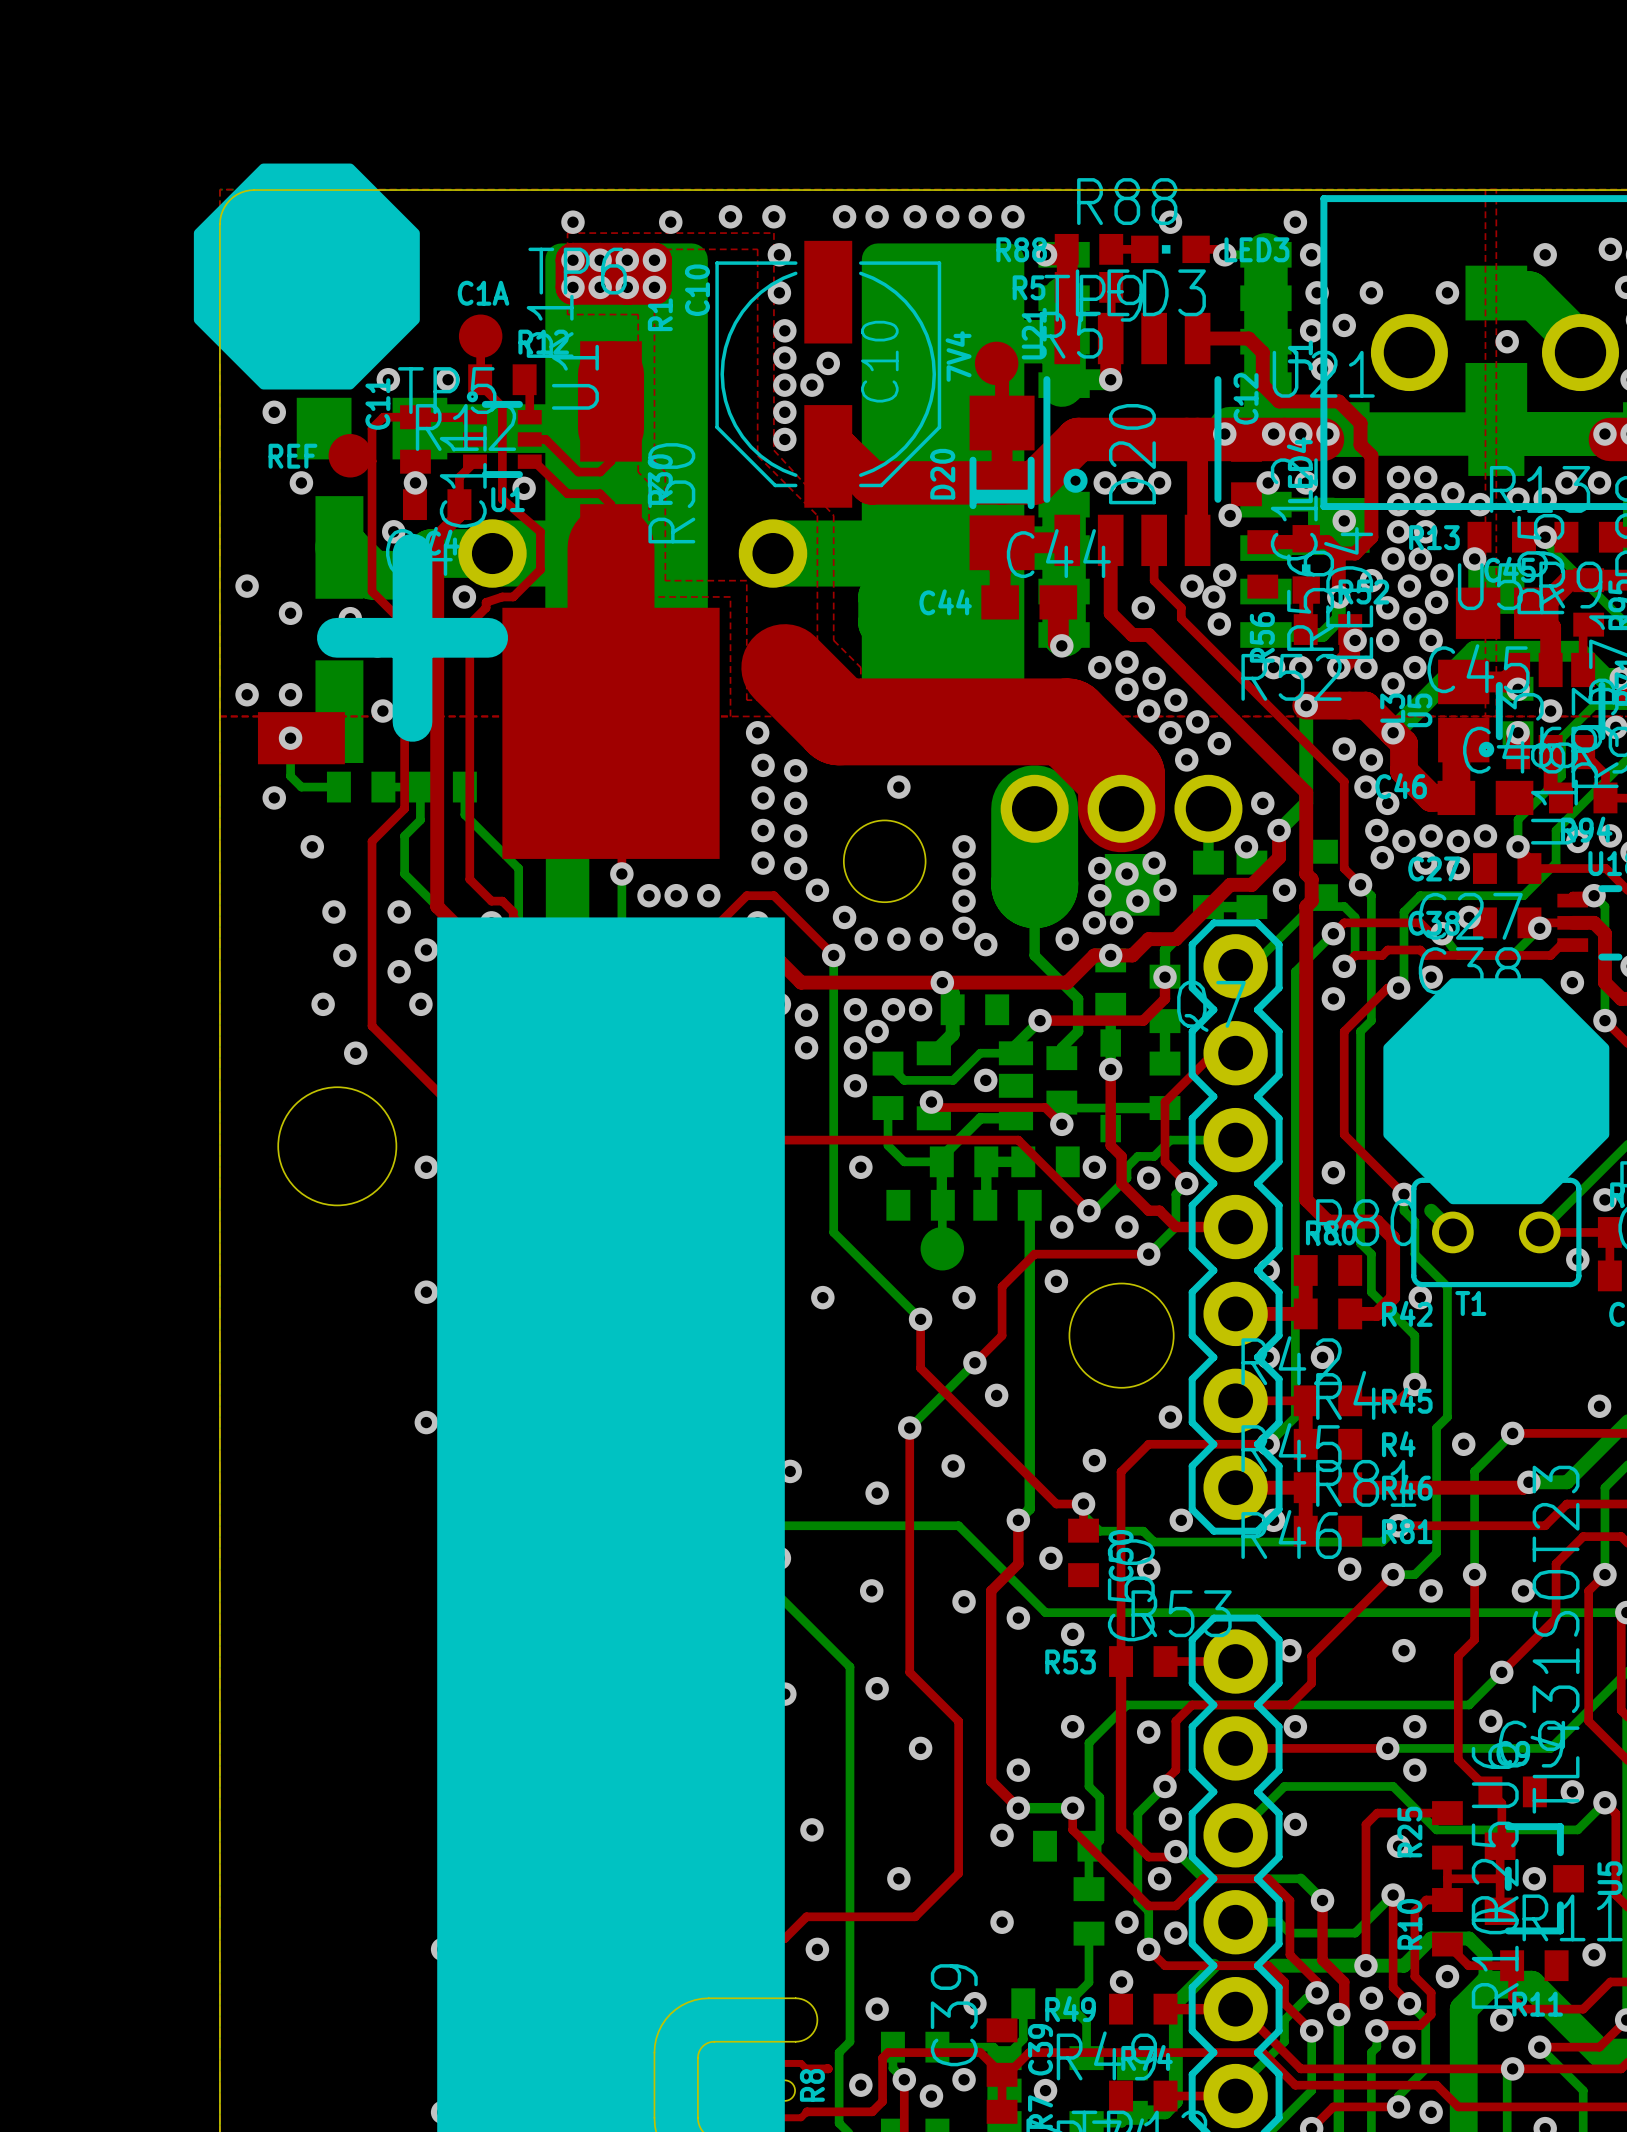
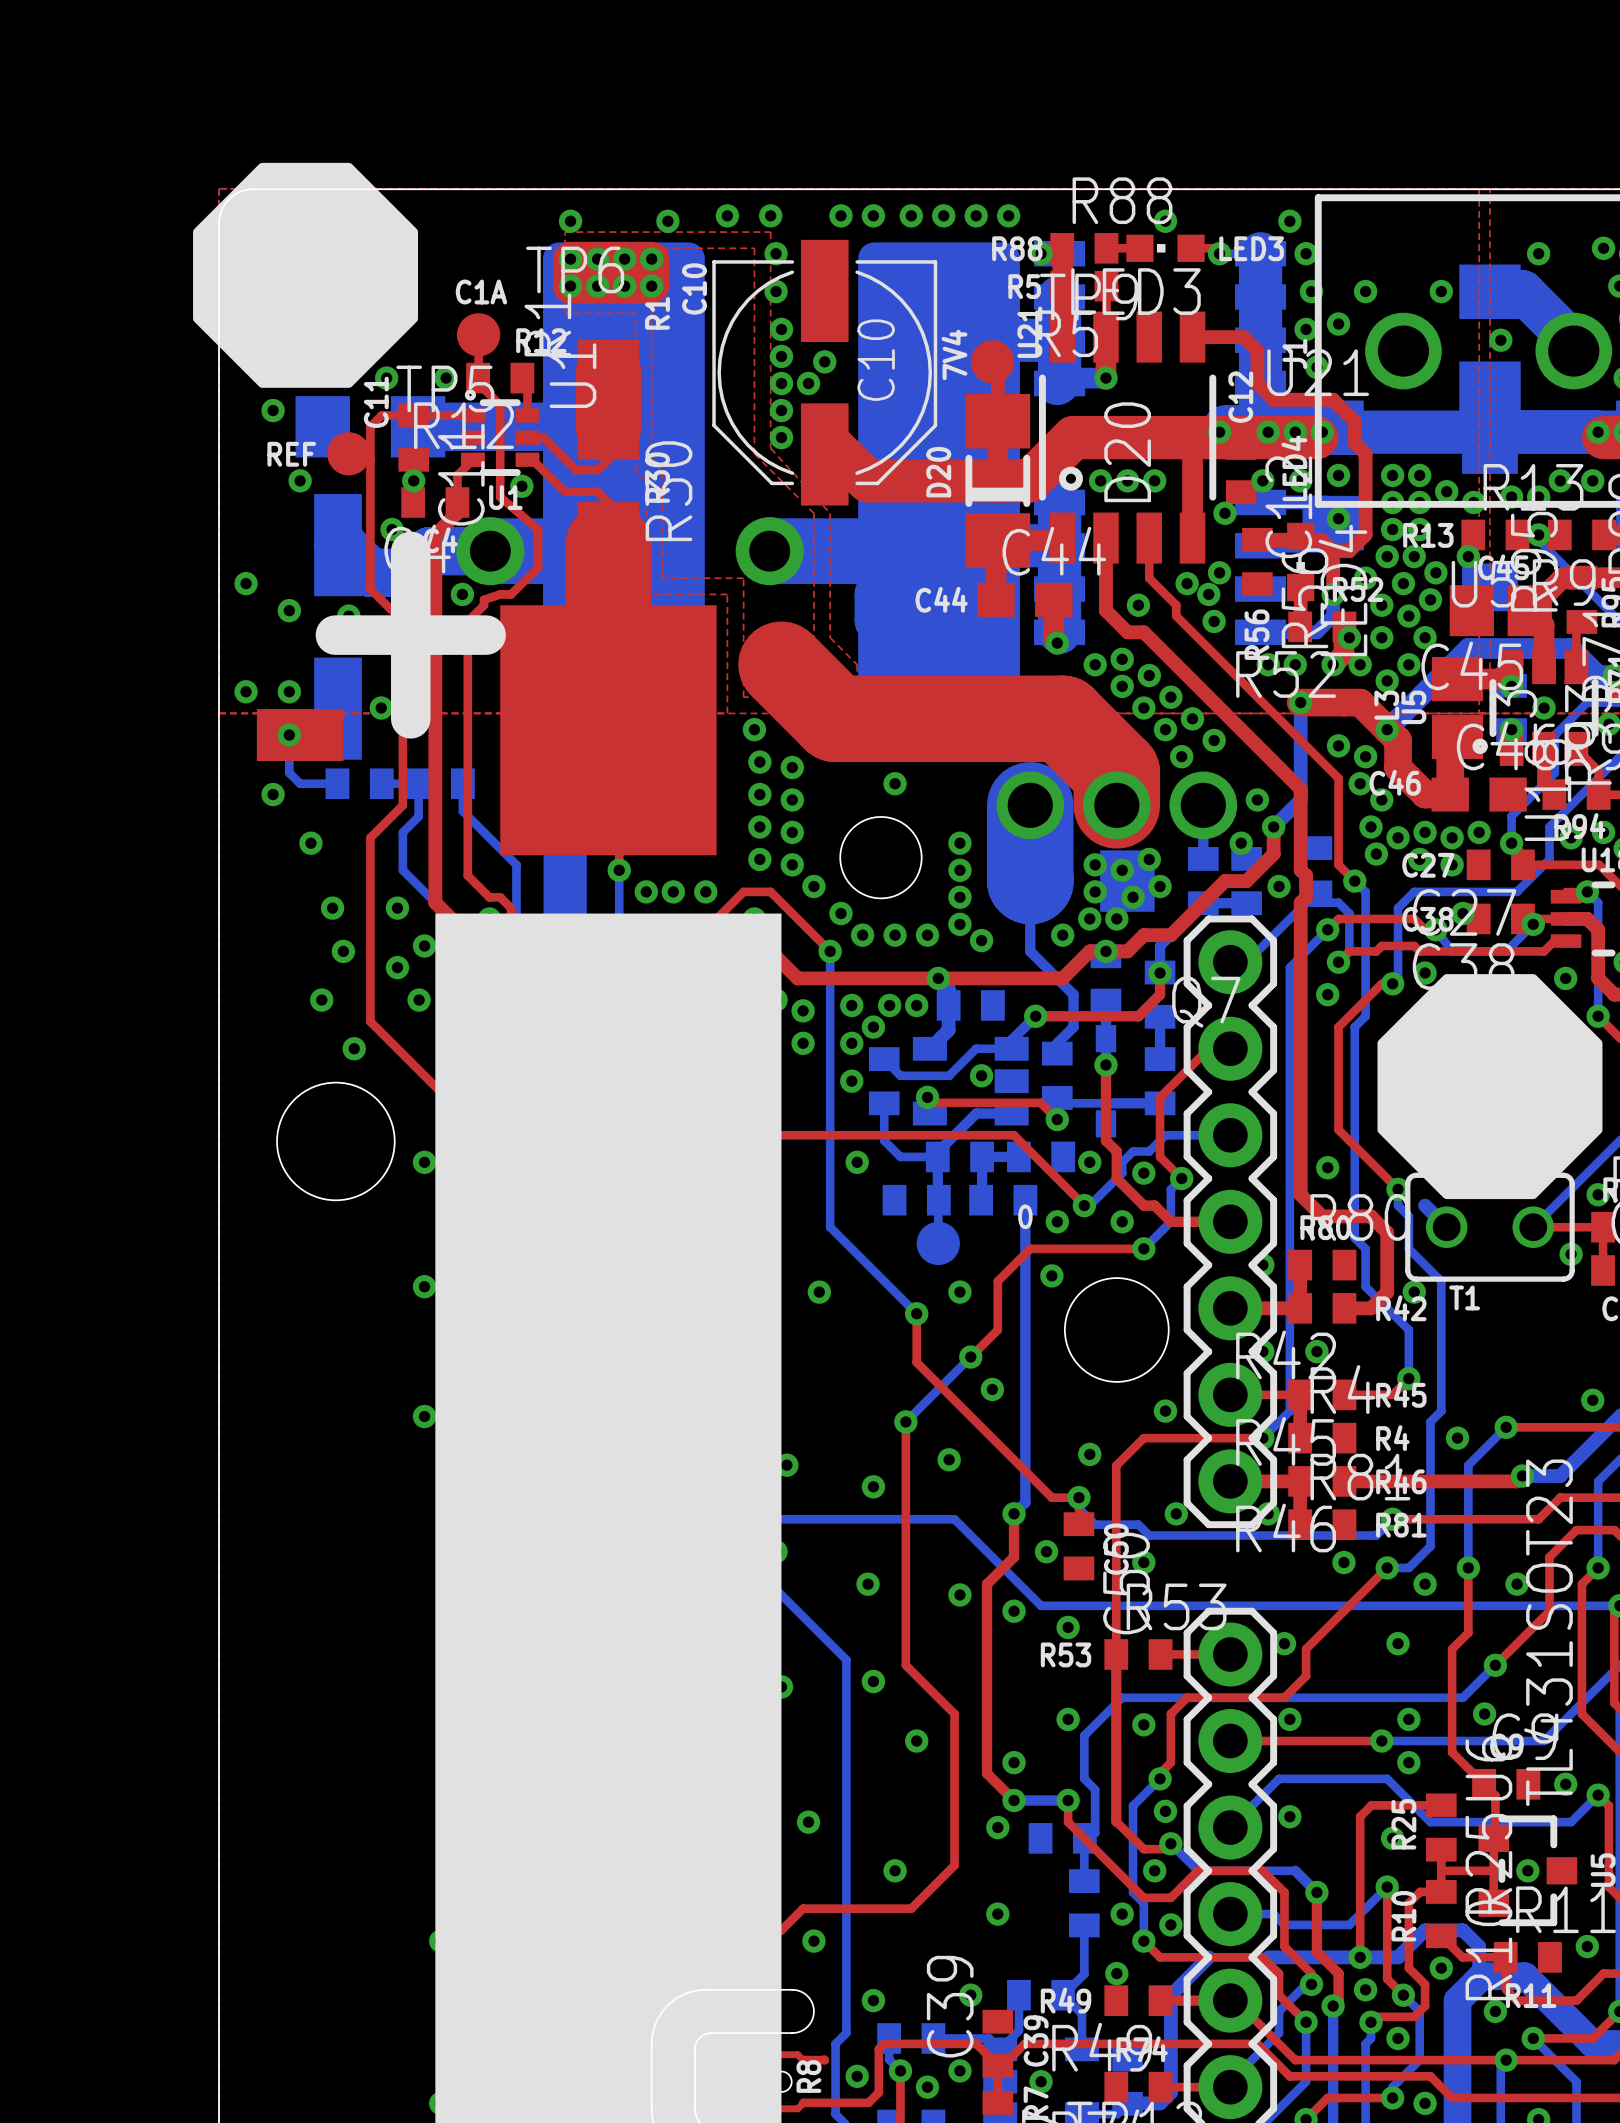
text: none -> 0 (1025, 1216)

